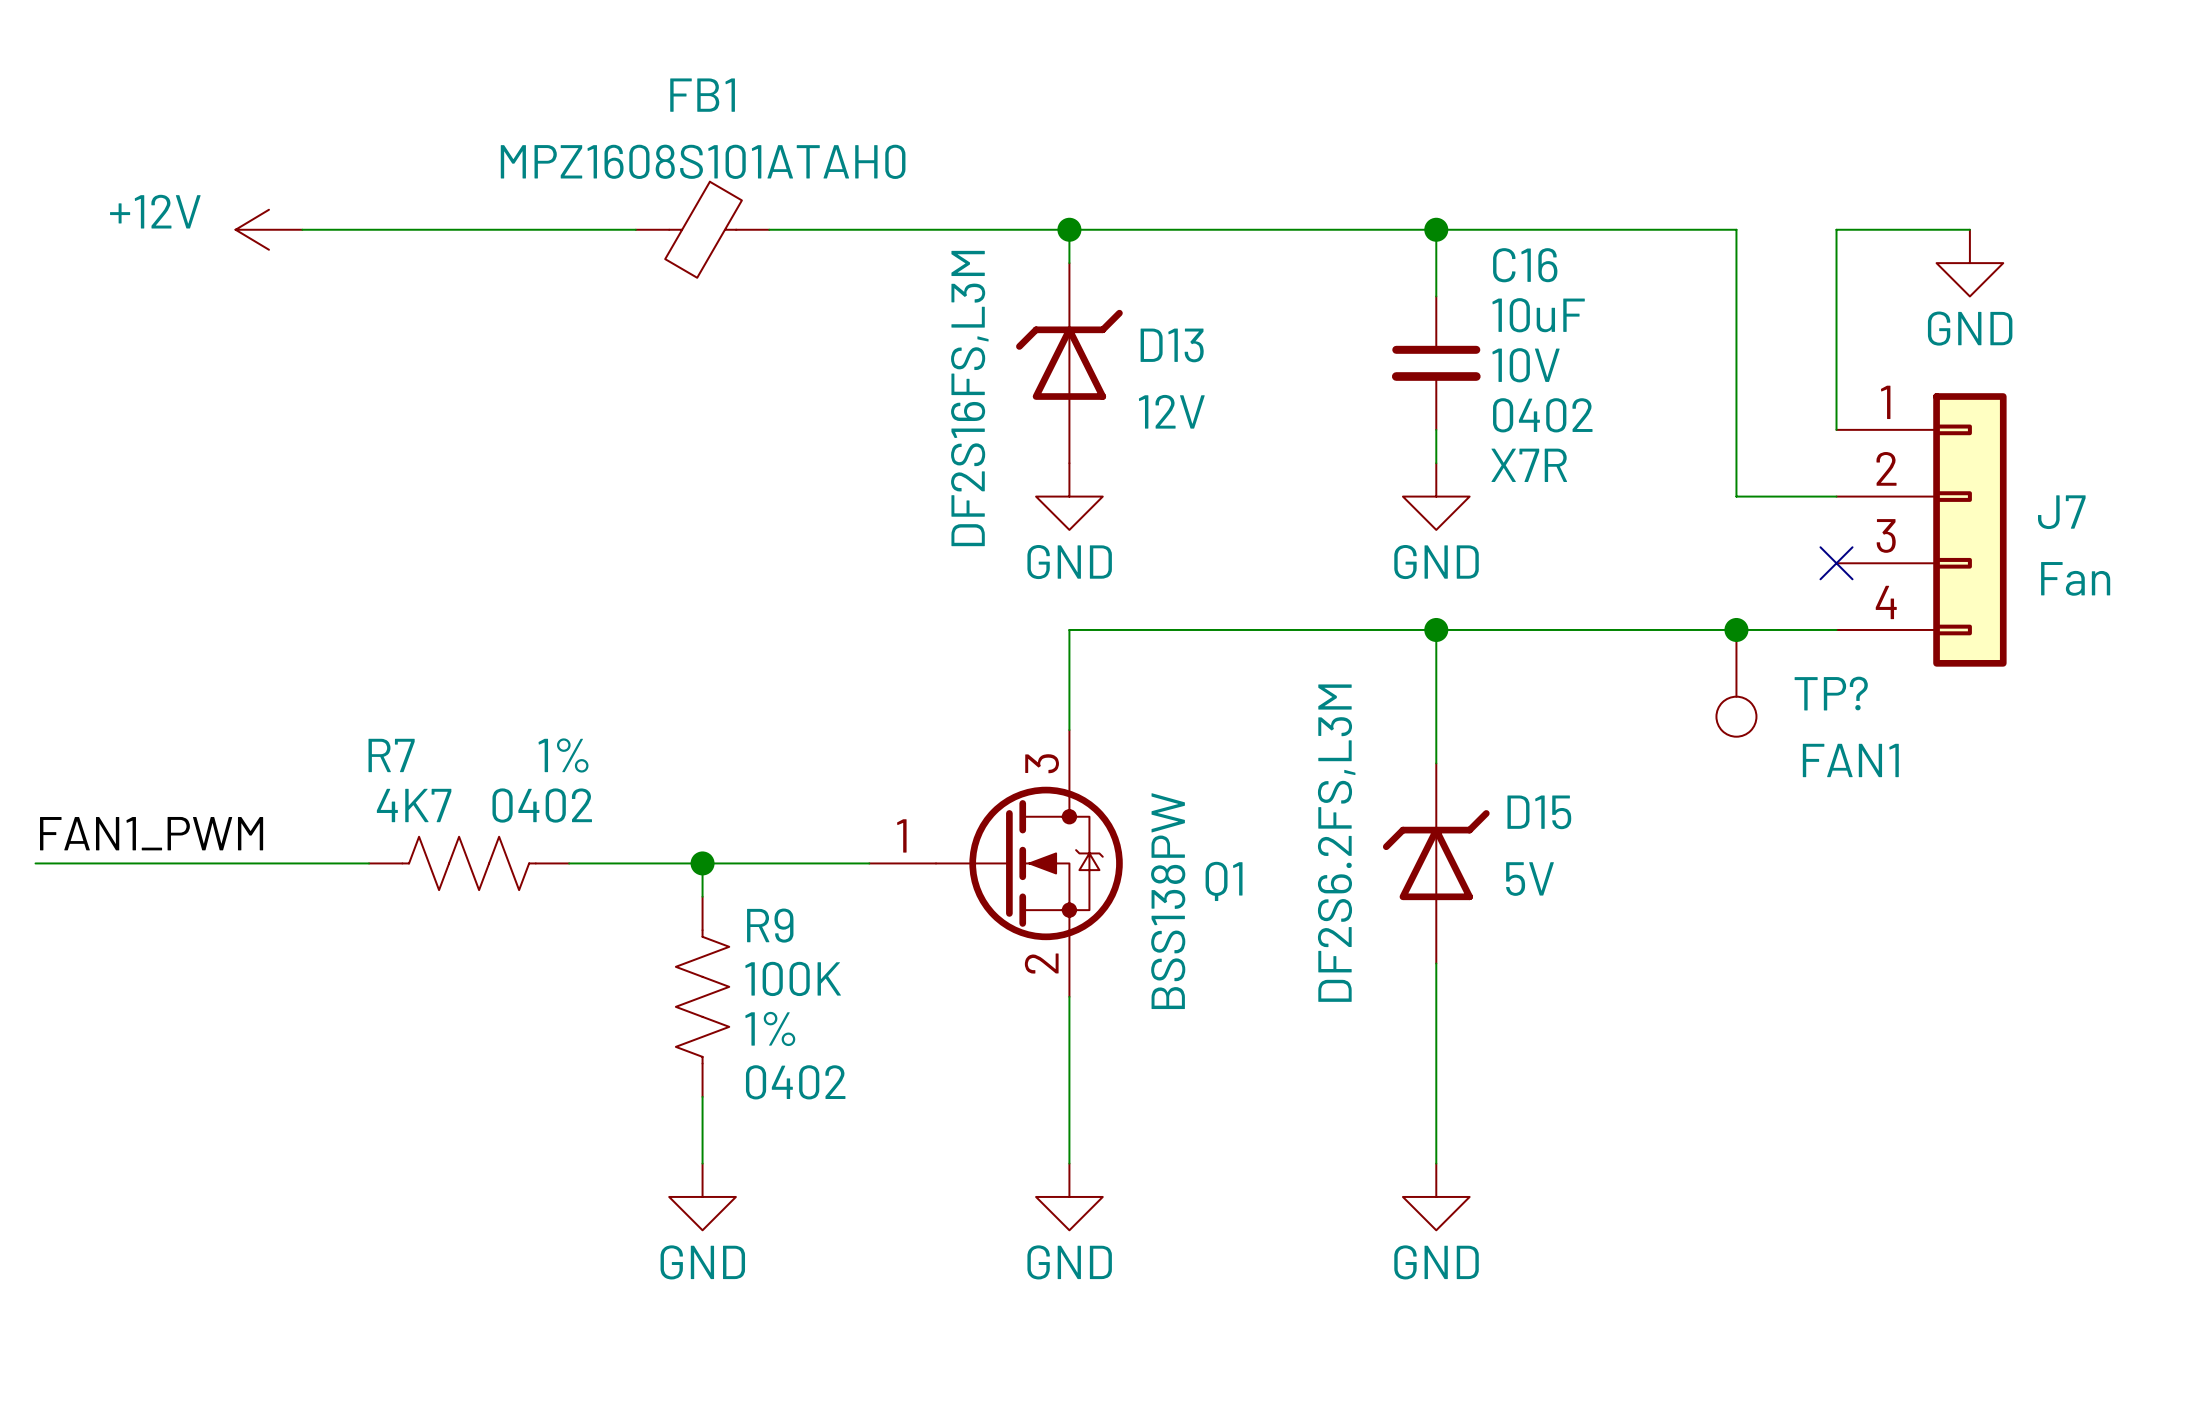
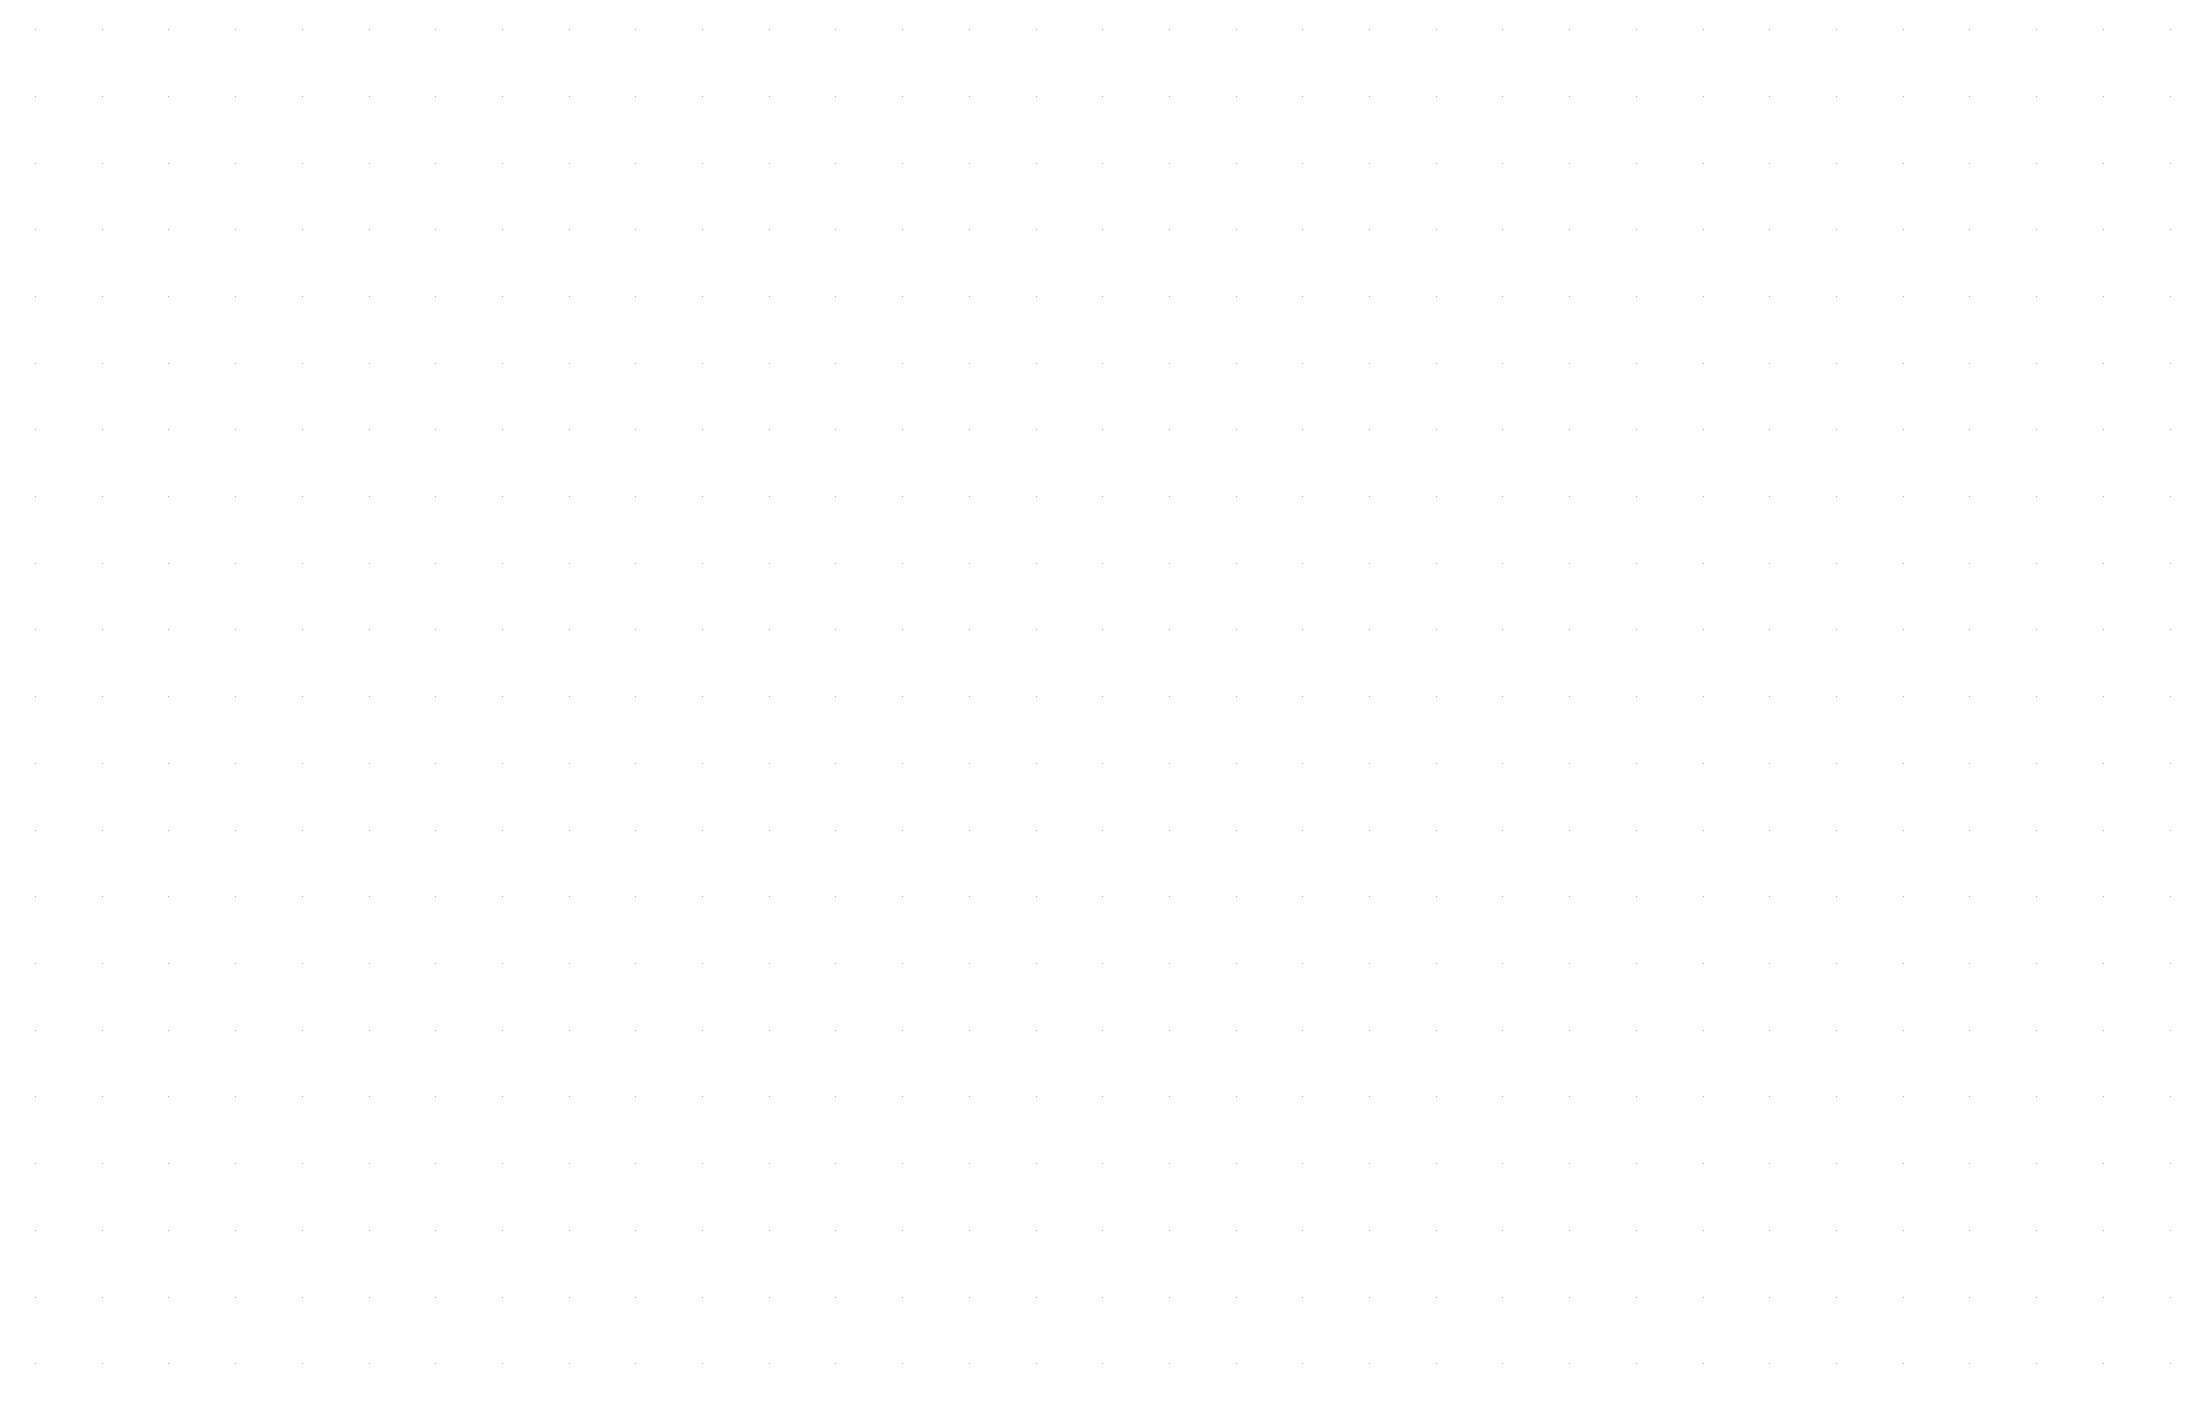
power symbol: +12V (268, 229) -> none
wire: (302, 229) (635, 229) -> none
FB1: MPZ1608S101ATAH0 (702, 229) -> none
wire: (769, 229) (1736, 229) (1736, 496) (1836, 496) -> none
wire: (1069, 229) (1069, 263) -> none
junction: (1069, 229) -> none
wire: (1436, 229) (1436, 296) -> none
junction: (1436, 229) -> none
wire: (1969, 229) (1836, 229) (1836, 429) -> none
power symbol: GND (1969, 263) -> none
D13: DF2S16FS,L3M (1069, 363) -> none
C16: 10uF (1436, 363) -> none
wire: (1436, 429) (1436, 463) -> none
power symbol: GND (1069, 496) -> none
power symbol: GND (1436, 496) -> none
J7: Fan (1921, 529) -> none
no-connect mark: (1836, 563) -> none
wire: (1436, 629) (1436, 763) -> none
junction: (1436, 629) -> none
junction: (1736, 629) -> none
wire: (1836, 629) (1069, 629) (1069, 730) -> none
TP?: FAN1 (1736, 683) -> none
label: FAN1_PWM (151, 833) -> none
wire: (35, 863) (369, 863) -> none
R7: 4K7 (469, 863) -> none
wire: (569, 863) (869, 863) -> none
wire: (702, 863) (702, 896) -> none
junction: (702, 863) -> none
Q1: BSS138PW (996, 863) -> none
D15: DF2S6.2FS,L3M (1436, 863) -> none
wire: (1436, 963) (1436, 1163) -> none
R9: 100K (702, 996) -> none
wire: (1069, 996) (1069, 1163) -> none
wire: (702, 1096) (702, 1163) -> none
power symbol: GND (702, 1196) -> none
power symbol: GND (1069, 1196) -> none
power symbol: GND (1436, 1196) -> none

